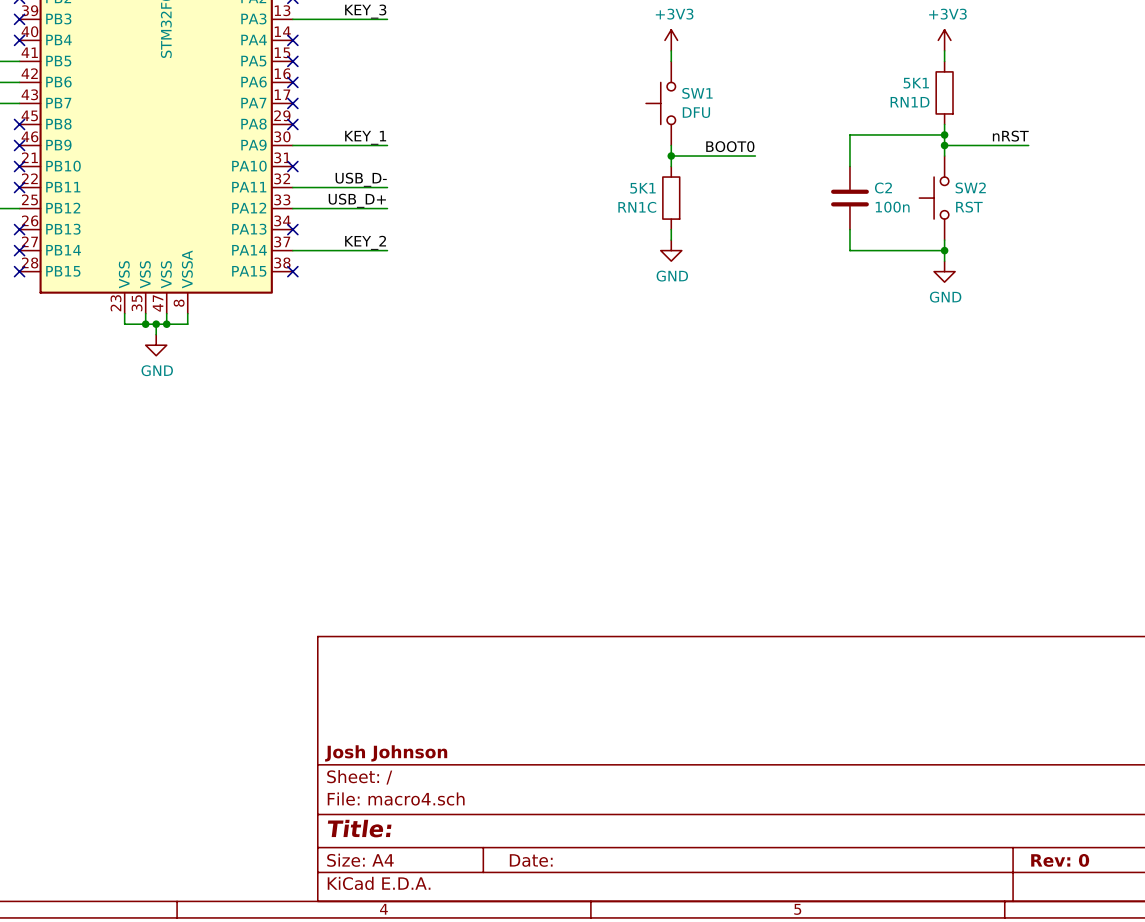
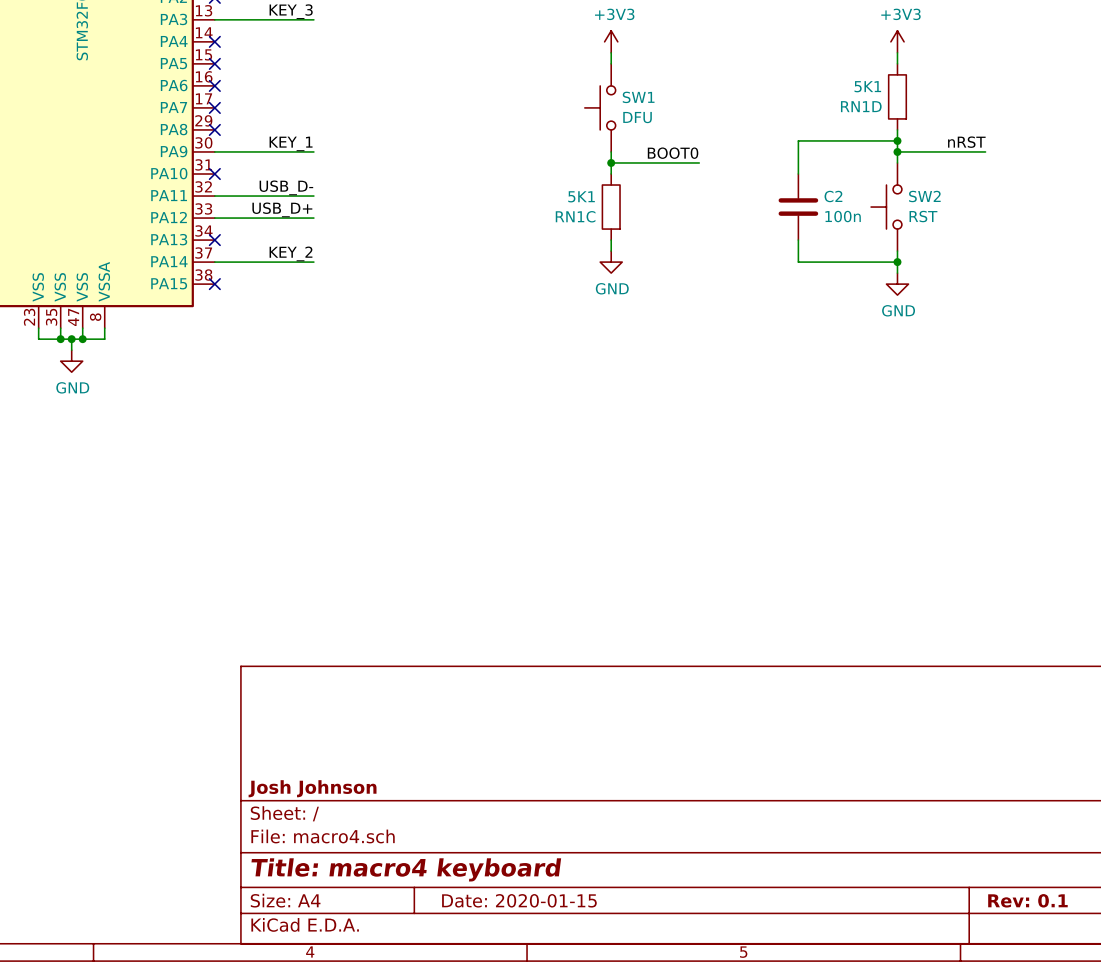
title block: Title: (359, 828) -> Title: macro4 keyboard (406, 869)
title block: Date: (531, 860) -> Date: 2020-01-15 (519, 900)
title block: Rev: 0 (1060, 860) -> Rev: 0.1 (1027, 900)

